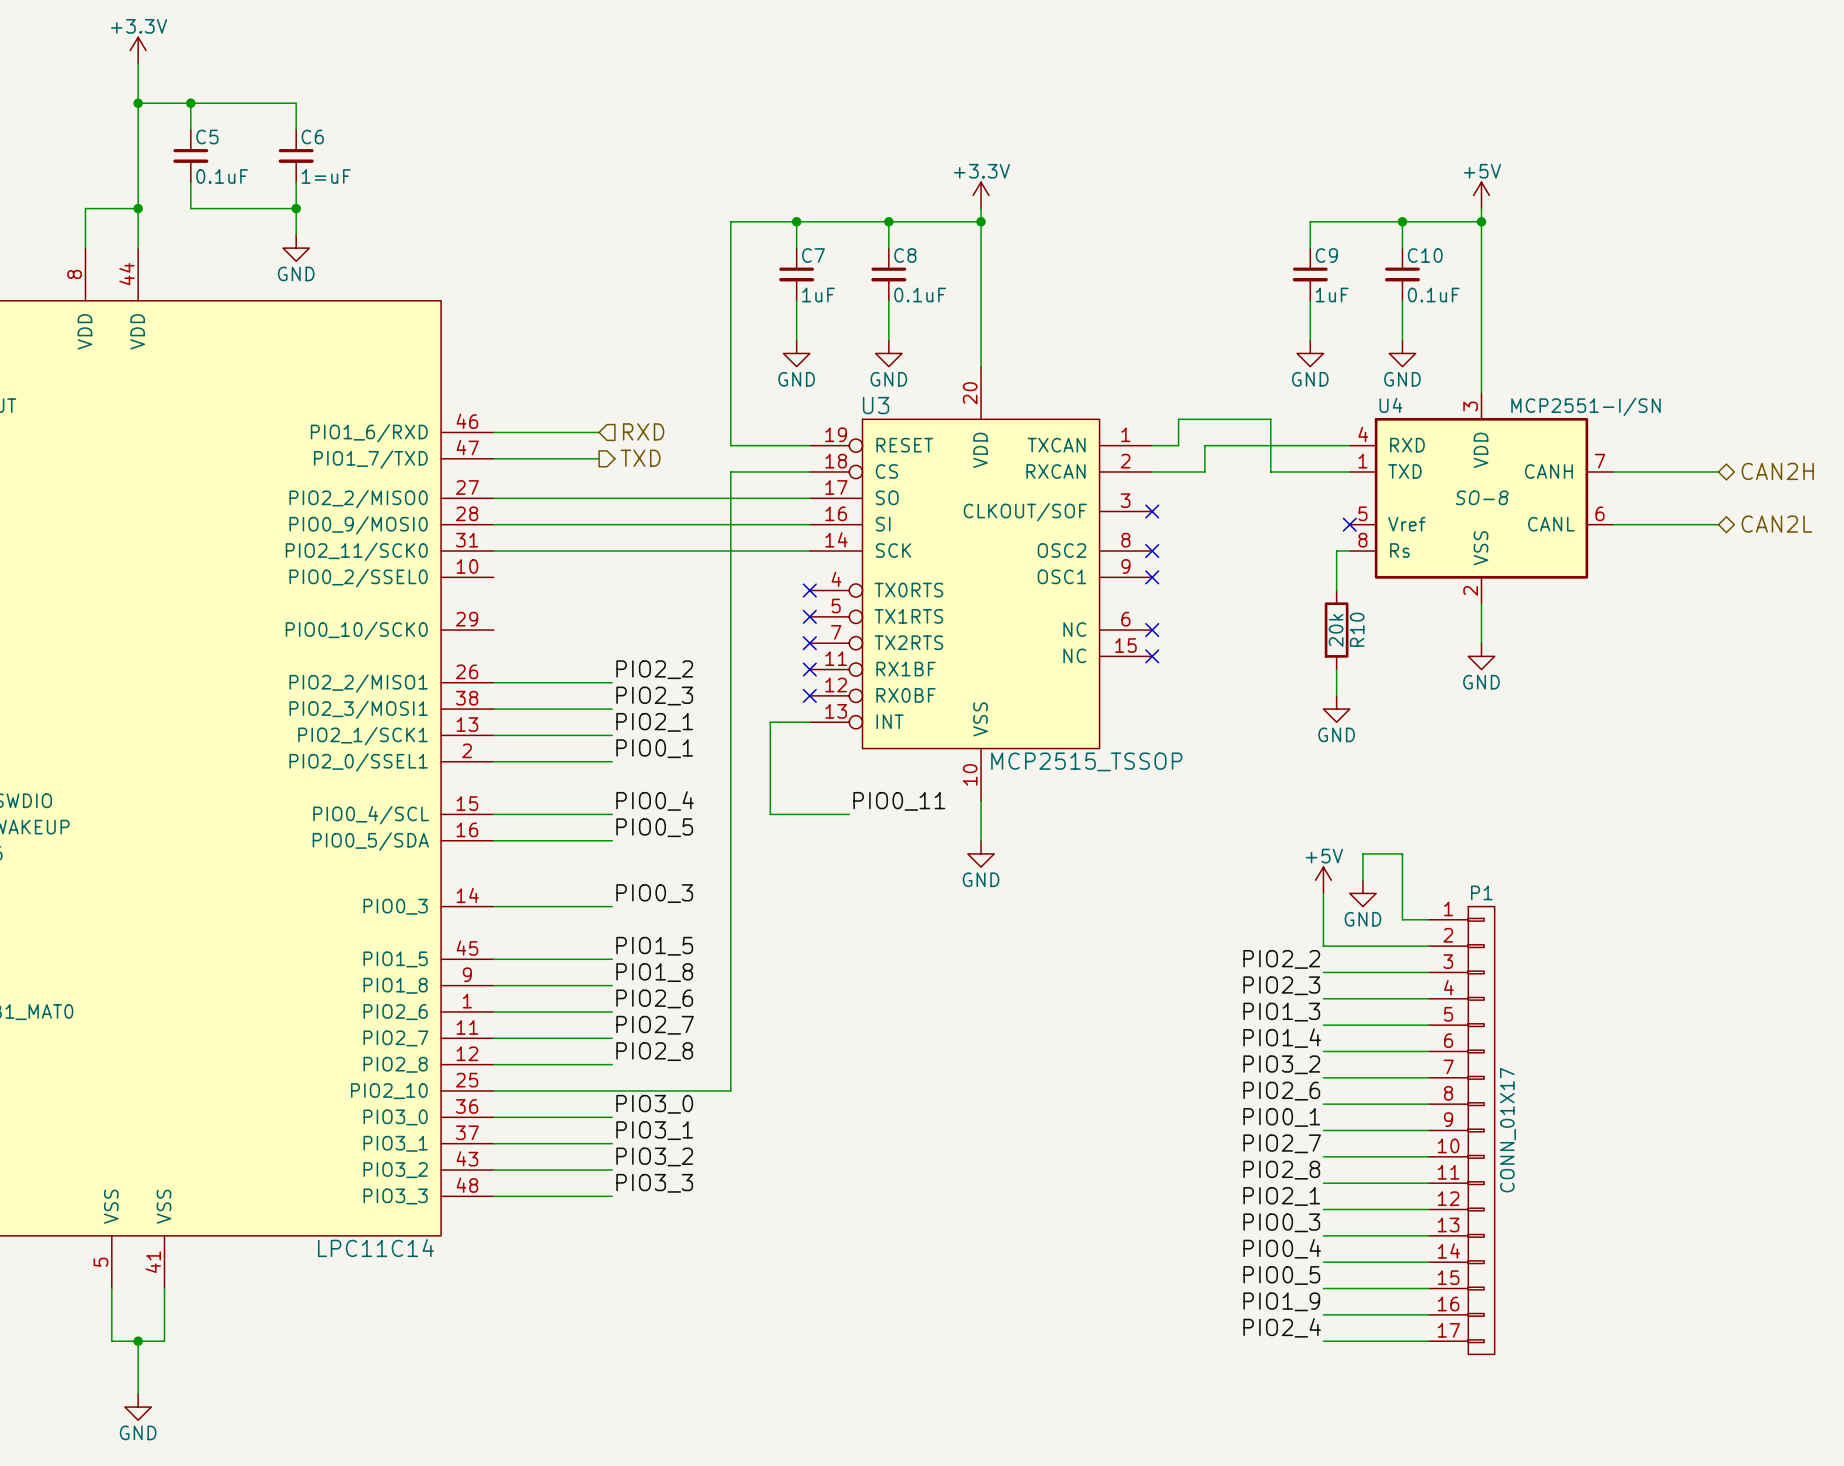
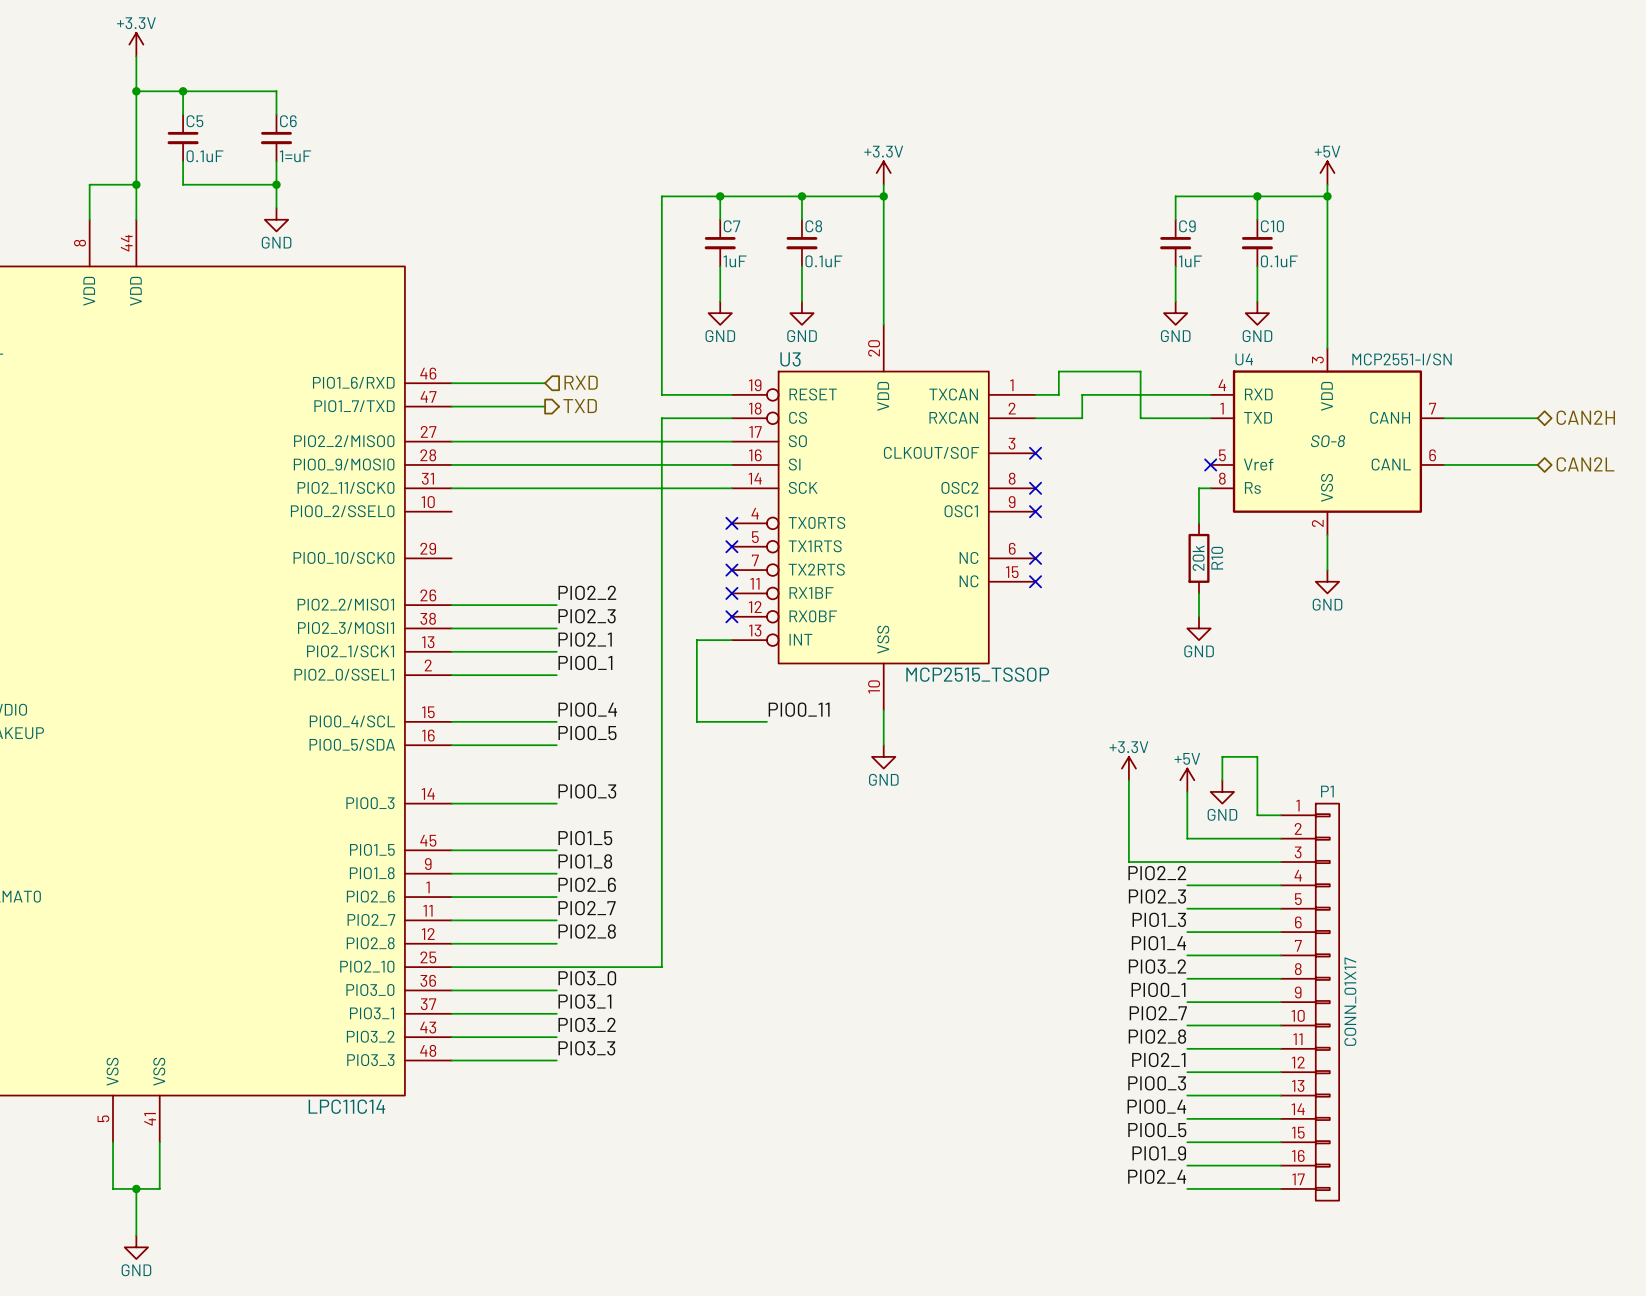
power symbol: none -> +3.3V (1128, 768)
wire: none -> (1128, 780) (1128, 862) (1187, 862)
label: PIO2_2 (1281, 959) -> none
label: PIO2_3 (1281, 985) -> PIO2_2 (1157, 873)
label: PIO1_3 (1281, 1012) -> PIO2_3 (1157, 896)
label: PIO1_4 (1282, 1038) -> PIO1_3 (1159, 919)
label: PIO3_2 (1281, 1064) -> PIO1_4 (1158, 943)
label: PIO2_6 (1281, 1091) -> PIO3_2 (1157, 966)

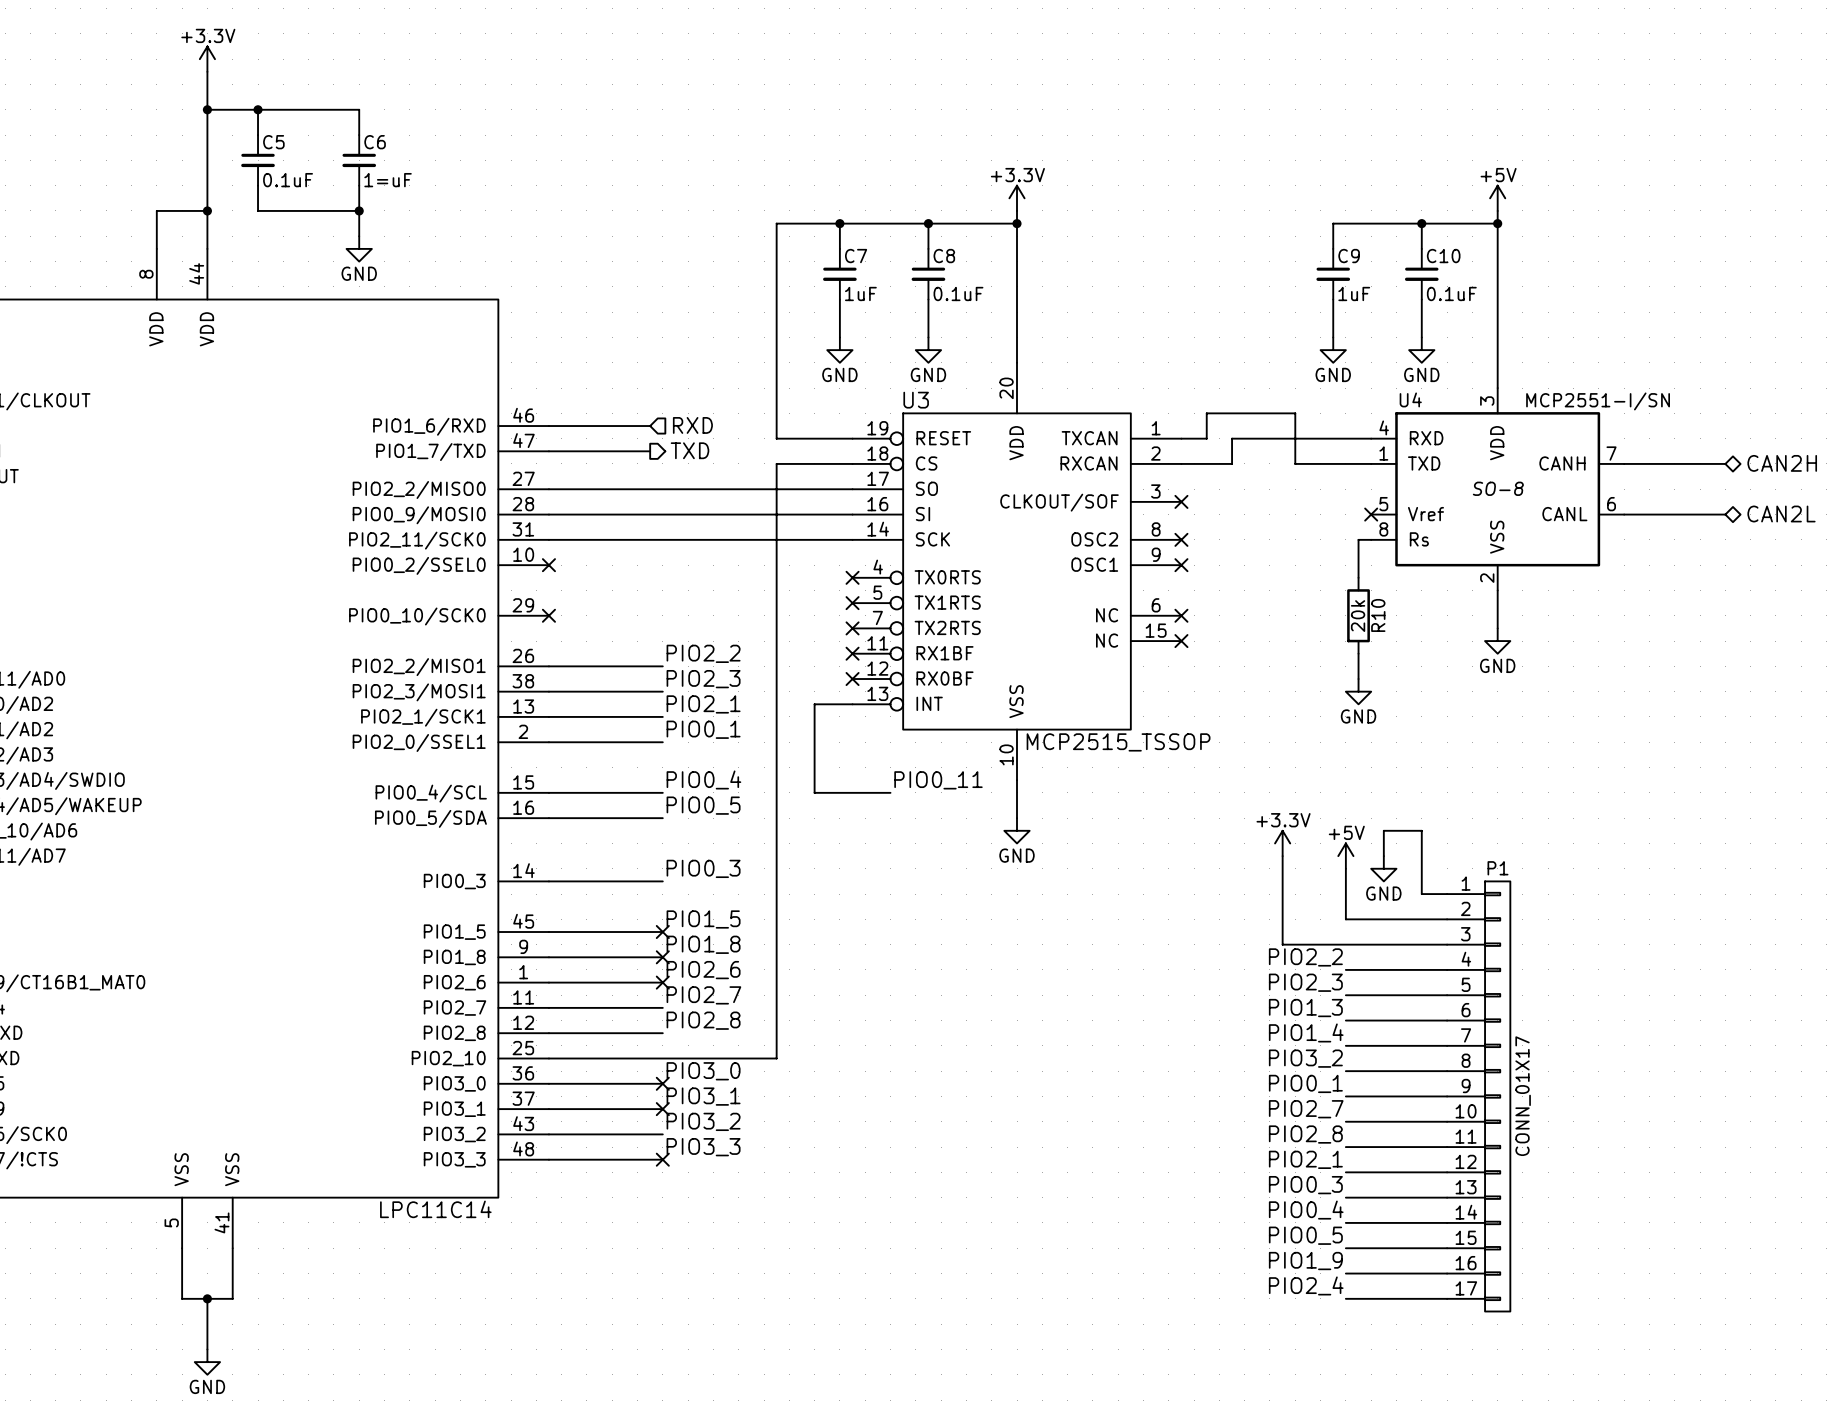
no-connect mark: none -> (548, 565)
no-connect mark: none -> (548, 615)
no-connect mark: none -> (662, 932)
no-connect mark: none -> (662, 957)
no-connect mark: none -> (662, 982)
no-connect mark: none -> (662, 1083)
no-connect mark: none -> (662, 1109)
no-connect mark: none -> (662, 1159)

